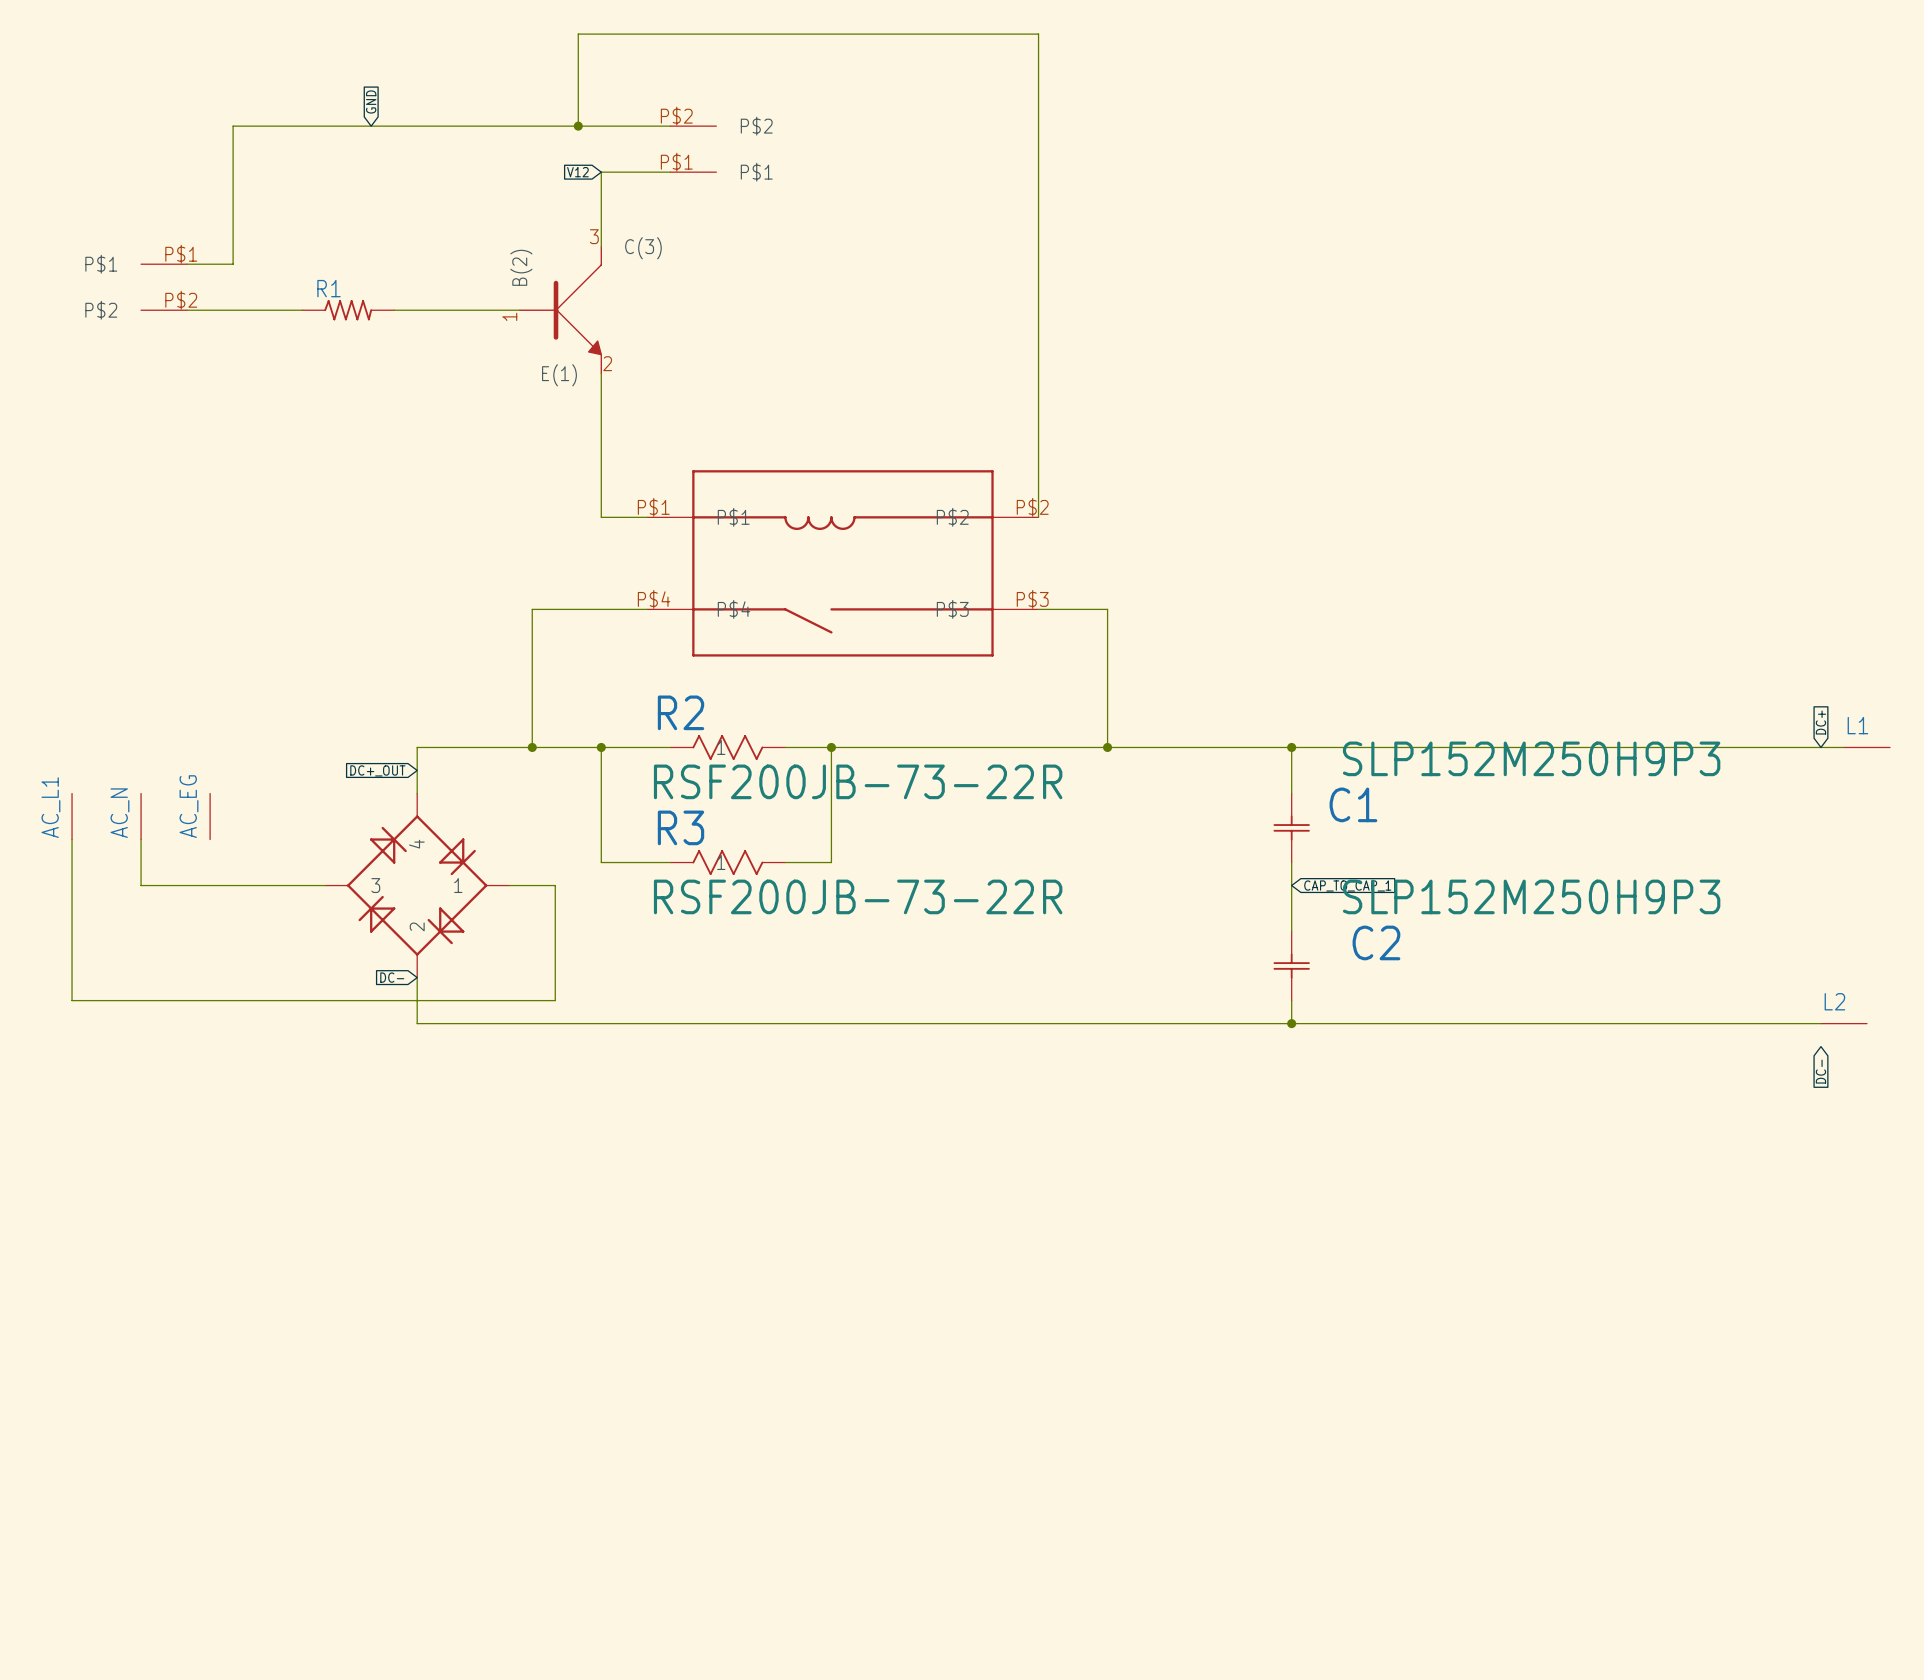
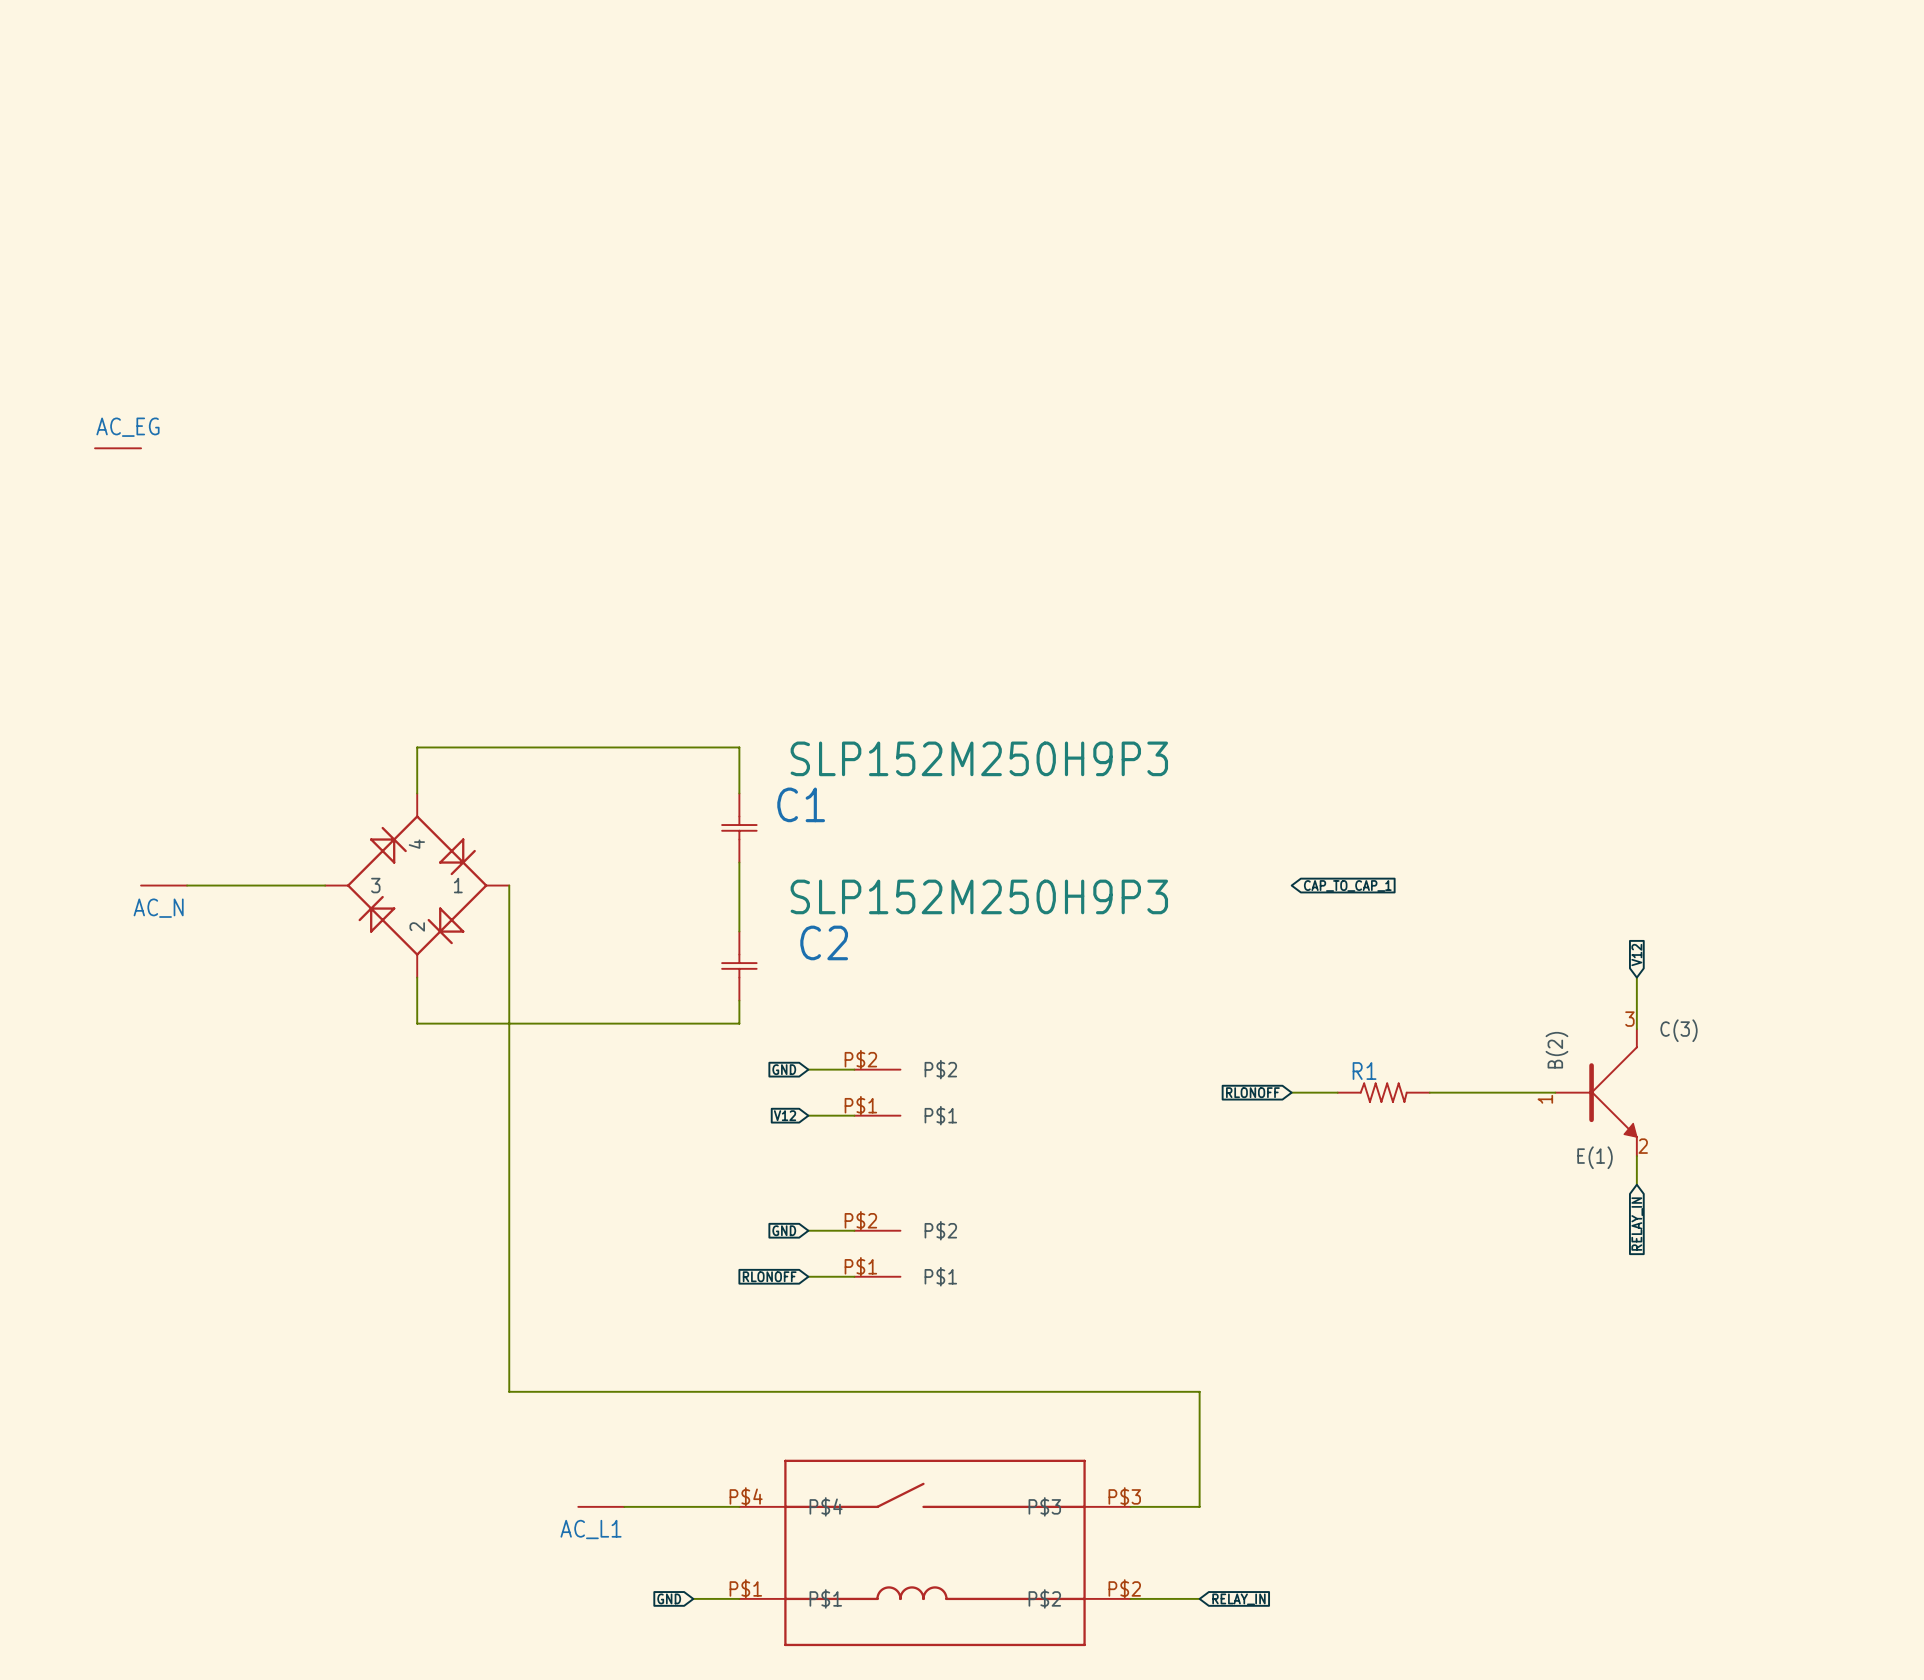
global label: GND (371, 101) -> none
wire: (578, 126) (578, 34) (1038, 34) (1038, 517) -> none
junction: (578, 126) -> none
wire: (670, 126) (233, 126) (233, 264) (187, 264) -> none
part: (693, 149) -> none
global label: V12 (577, 172) -> none
wire: (670, 172) (601, 172) (601, 246) -> none
part: (164, 287) -> none
wire: (187, 310) (302, 310) -> none
R1 position: (348, 310) -> (1383, 1092)
wire: (394, 310) (519, 310) -> none
part: (560, 310) -> none
wire: (601, 373) (601, 517) (647, 517) -> none
AC_EG: none -> (118, 448)
part: (842, 563) -> none
wire: (647, 609) (532, 609) (532, 747) -> none
wire: (1038, 609) (1107, 609) (1107, 747) -> none
global label: DC+ (1820, 722) -> none
junction: (532, 747) -> none
wire: (601, 747) (601, 862) (670, 862) -> none
junction: (601, 747) -> none
wire: none -> (670, 747) (739, 747) (739, 793)
R2: RSF200JB-73-22R (727, 747) -> none
wire: (785, 747) (1843, 747) -> none
wire: (831, 747) (831, 862) (785, 862) -> none
junction: (831, 747) -> none
junction: (1107, 747) -> none
wire: (1291, 747) (1291, 793) -> none
junction: (1291, 747) -> none
L1: (1866, 747) -> none
global label: DC+_OUT (377, 770) -> none
AC_L1 name position: AC_L1 (50, 807) -> AC_L1 (591, 1529)
AC_N name position: AC_N (119, 813) -> AC_N (158, 908)
AC_L1 rotation: 0° (72, 816) -> 90° clockwise (601, 1506)
AC_L1 position: (72, 816) -> (601, 1506)
AC_N rotation: 0° (141, 816) -> 90° clockwise (164, 885)
AC_N position: (141, 816) -> (164, 885)
AC_EG: (210, 816) -> none
C1 position: (1291, 828) -> (739, 828)
wire: (72, 839) (72, 1000) (555, 1000) (555, 885) (509, 885) -> (1130, 1506) (1199, 1506) (1199, 1391) (509, 1391) (509, 885)
wire: (141, 839) (141, 885) (187, 885) -> none
R3: RSF200JB-73-22R (727, 862) -> none
wire: none -> (739, 862) (739, 931)
wire: (1291, 862) (1291, 931) -> none
global label: none -> V12 (1636, 955)
C2 position: (1291, 966) -> (739, 966)
global label: DC- (392, 977) -> none
wire: none -> (1636, 977) (1636, 1029)
wire: (1291, 1000) (1291, 1023) -> none
wire: (739, 1023) (1820, 1023) -> (739, 1023) (739, 1000)
junction: (1291, 1023) -> none
L2: (1843, 1023) -> none
global label: none -> GND (784, 1069)
wire: none -> (808, 1069) (854, 1069)
global label: DC- (1820, 1071) -> none
part: none -> (877, 1092)
global label: none -> RLONOFF (1252, 1092)
wire: none -> (1291, 1092) (1337, 1092)
wire: none -> (1429, 1092) (1555, 1092)
part: none -> (1596, 1092)
global label: none -> V12 (785, 1115)
wire: none -> (808, 1115) (854, 1115)
wire: none -> (1636, 1156) (1636, 1184)
global label: none -> RELAY_IN (1637, 1224)
global label: none -> GND (784, 1230)
wire: none -> (808, 1230) (854, 1230)
part: none -> (877, 1253)
global label: none -> RLONOFF (769, 1276)
wire: none -> (808, 1276) (854, 1276)
wire: none -> (624, 1506) (739, 1506)
part: none -> (934, 1552)
global label: none -> GND (669, 1598)
wire: none -> (693, 1598) (739, 1598)
wire: none -> (1130, 1598) (1199, 1598)
global label: none -> RELAY_IN (1238, 1599)

